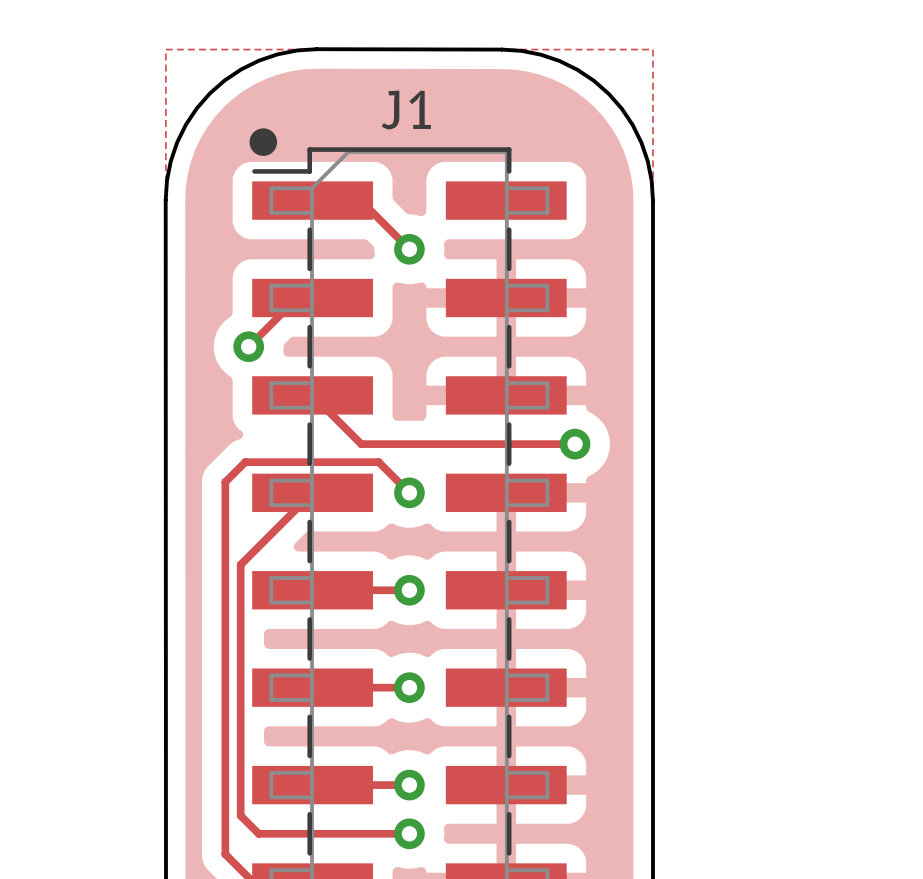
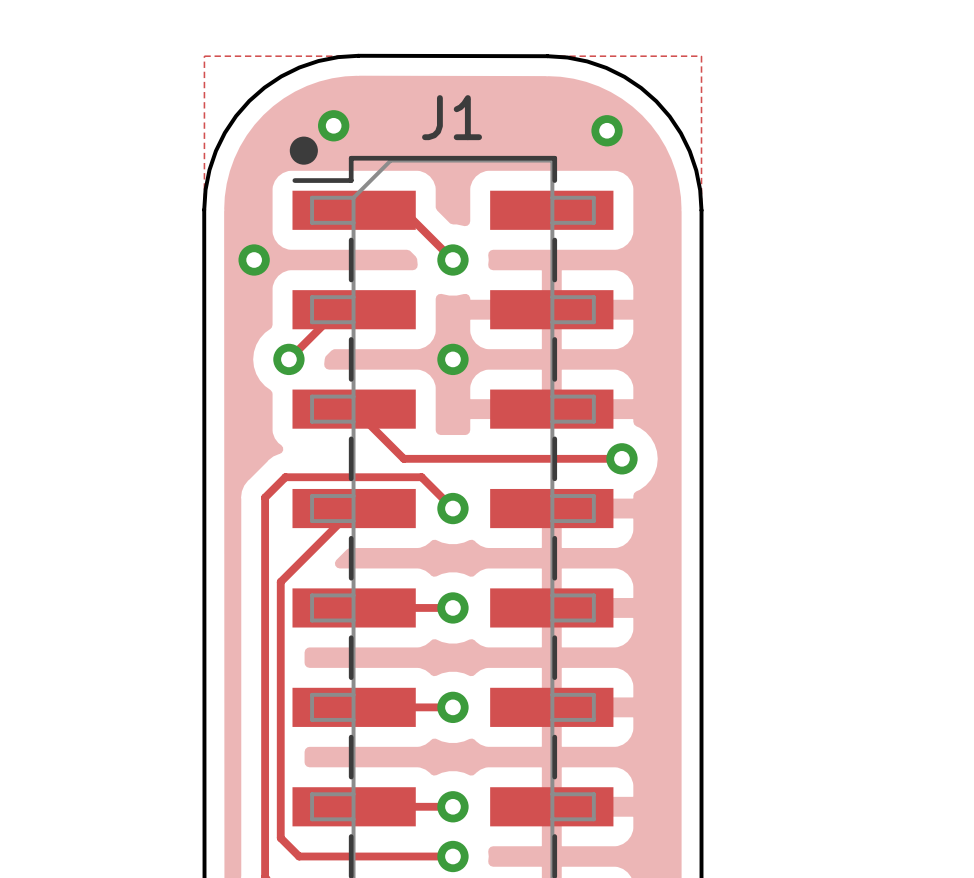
via: none -> (333, 125)
via: none -> (607, 130)
via: none -> (254, 260)
via: none -> (452, 359)

